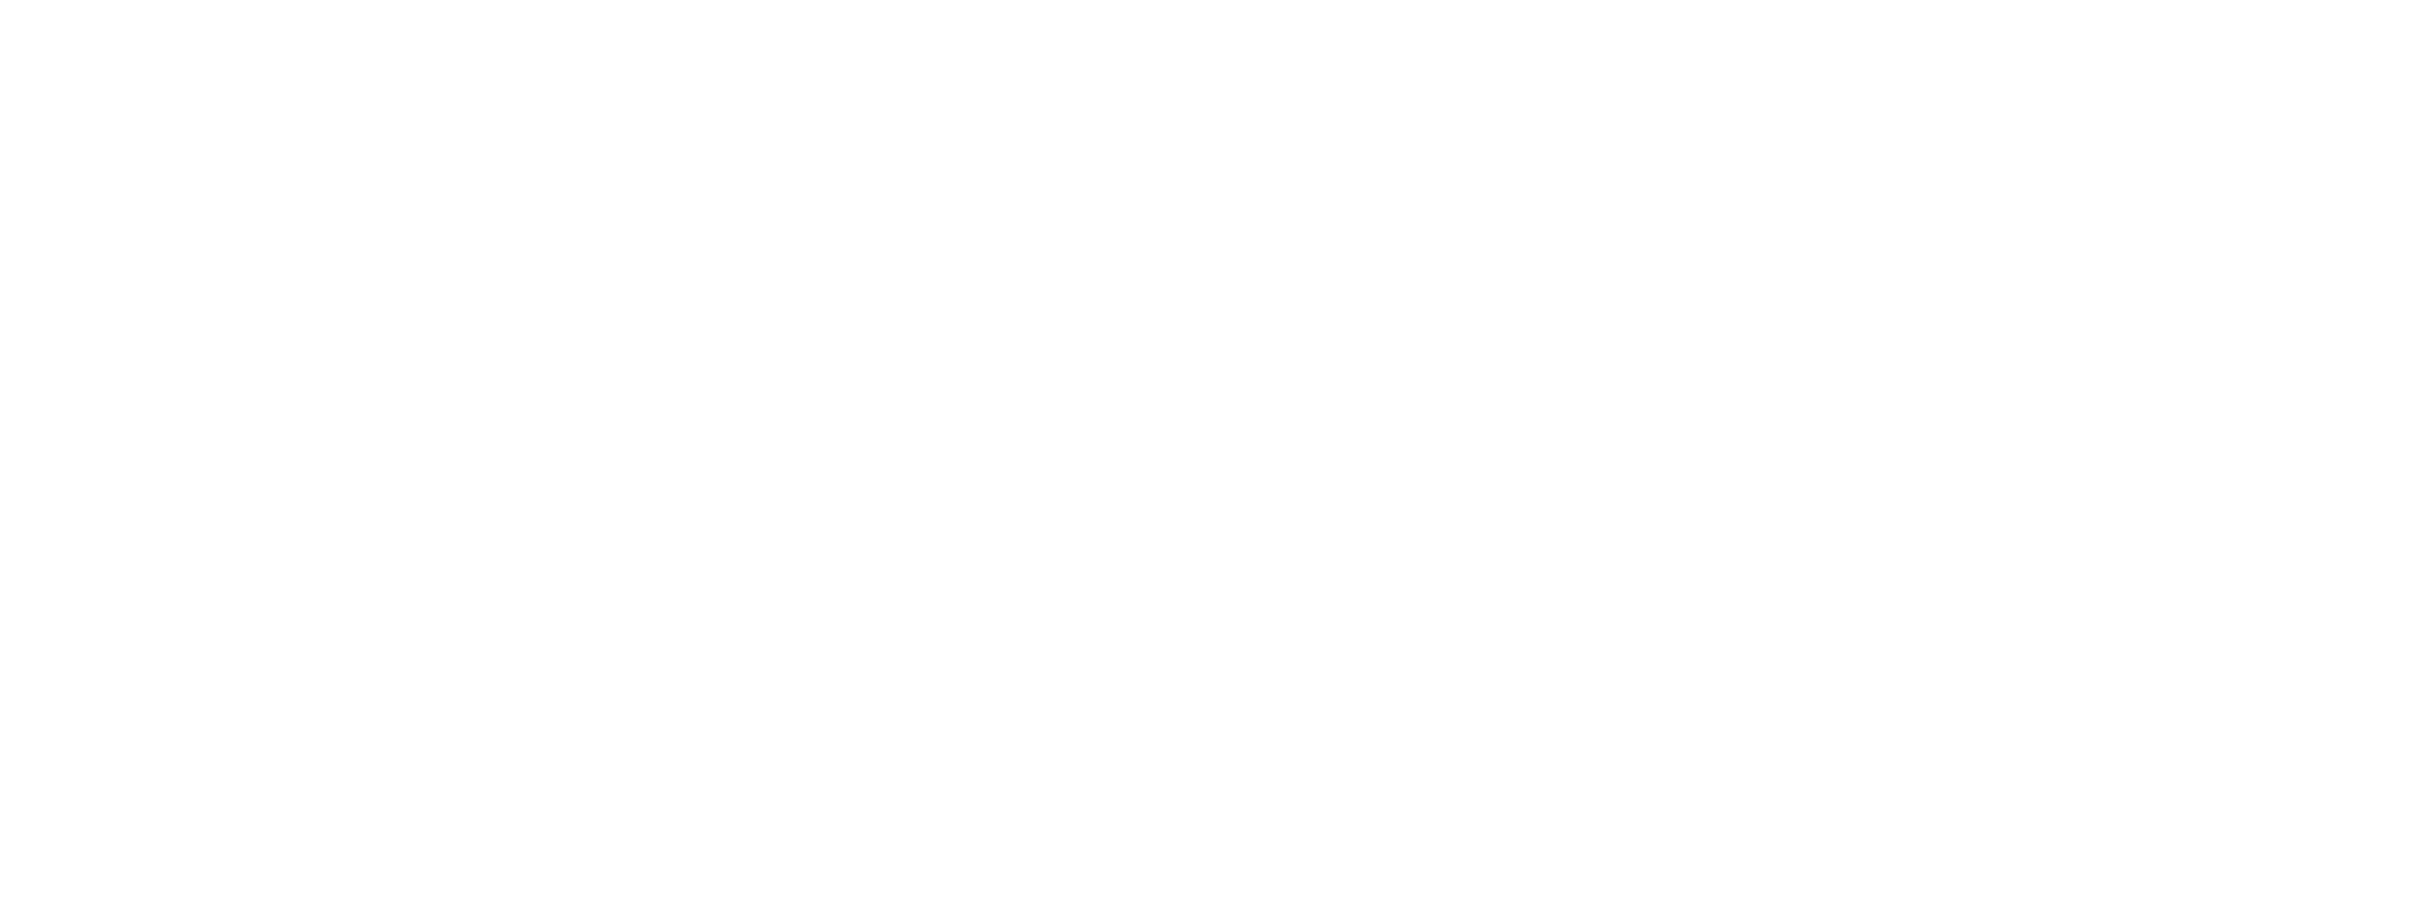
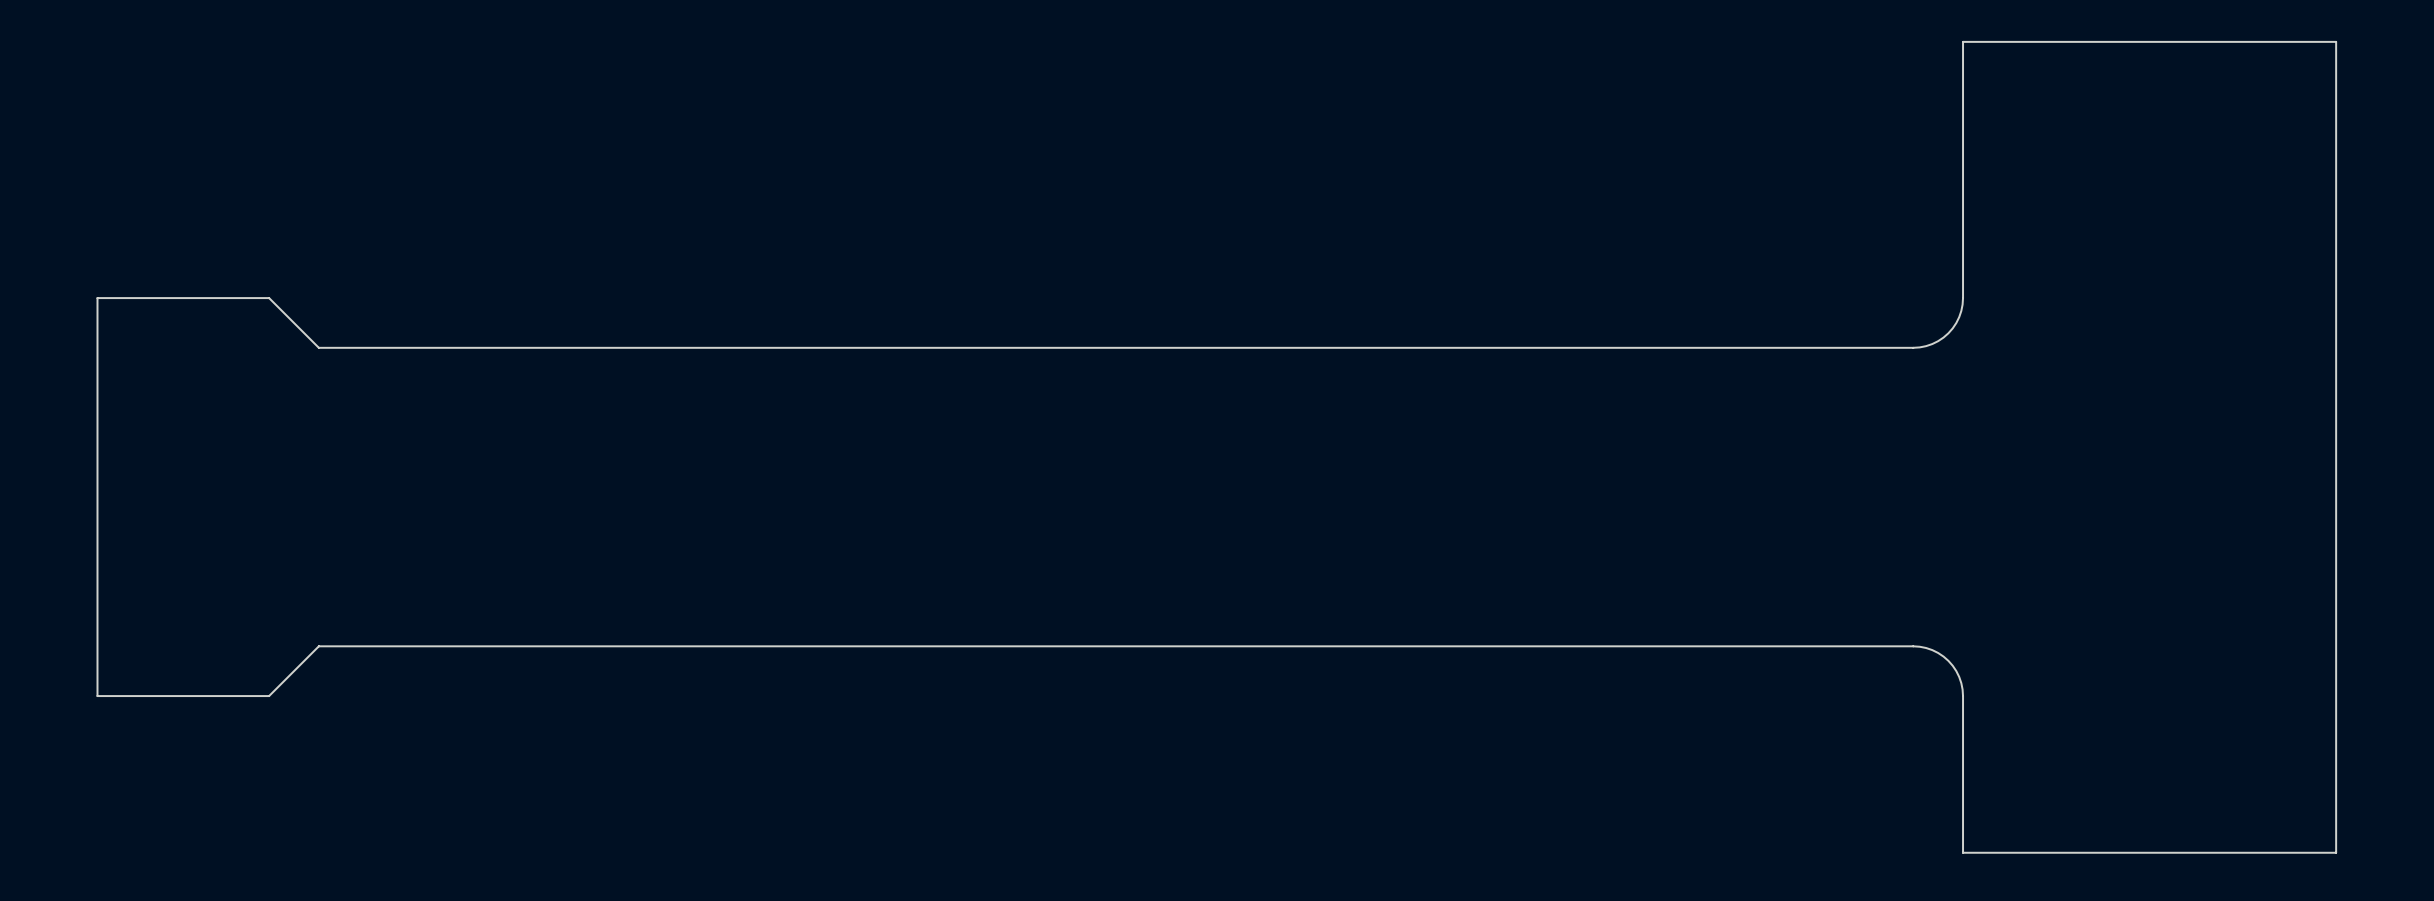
board edge: none -> (2336, 41) (2336, 852) (1963, 852) (1963, 696) (1961, 683) (1956, 671) (1948, 660) (1938, 652) (1919, 646) (318, 646) (269, 696) (97, 696) (97, 298) (269, 298) (318, 347) (1919, 347) (1938, 341) (1948, 333) (1956, 322) (1962, 304) (1963, 41) (2336, 41)

